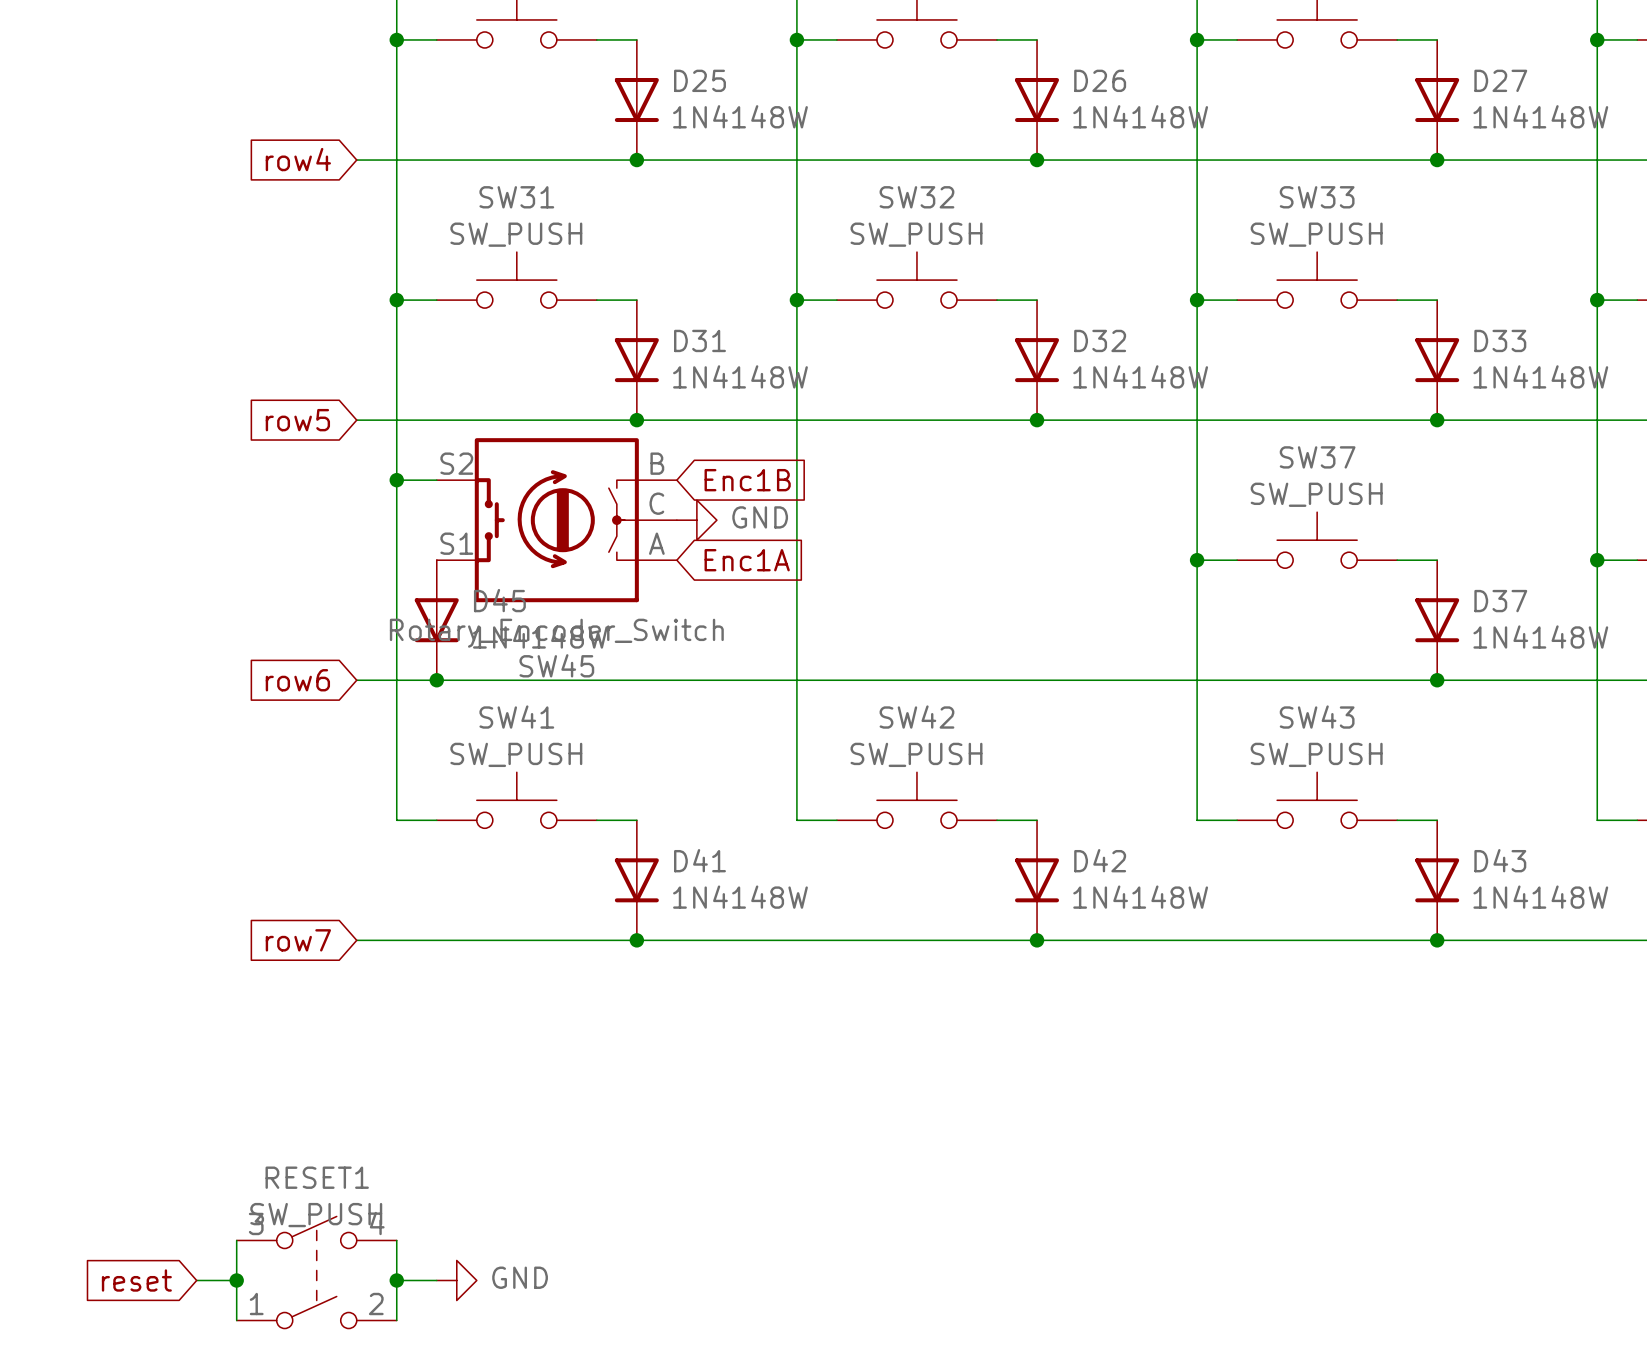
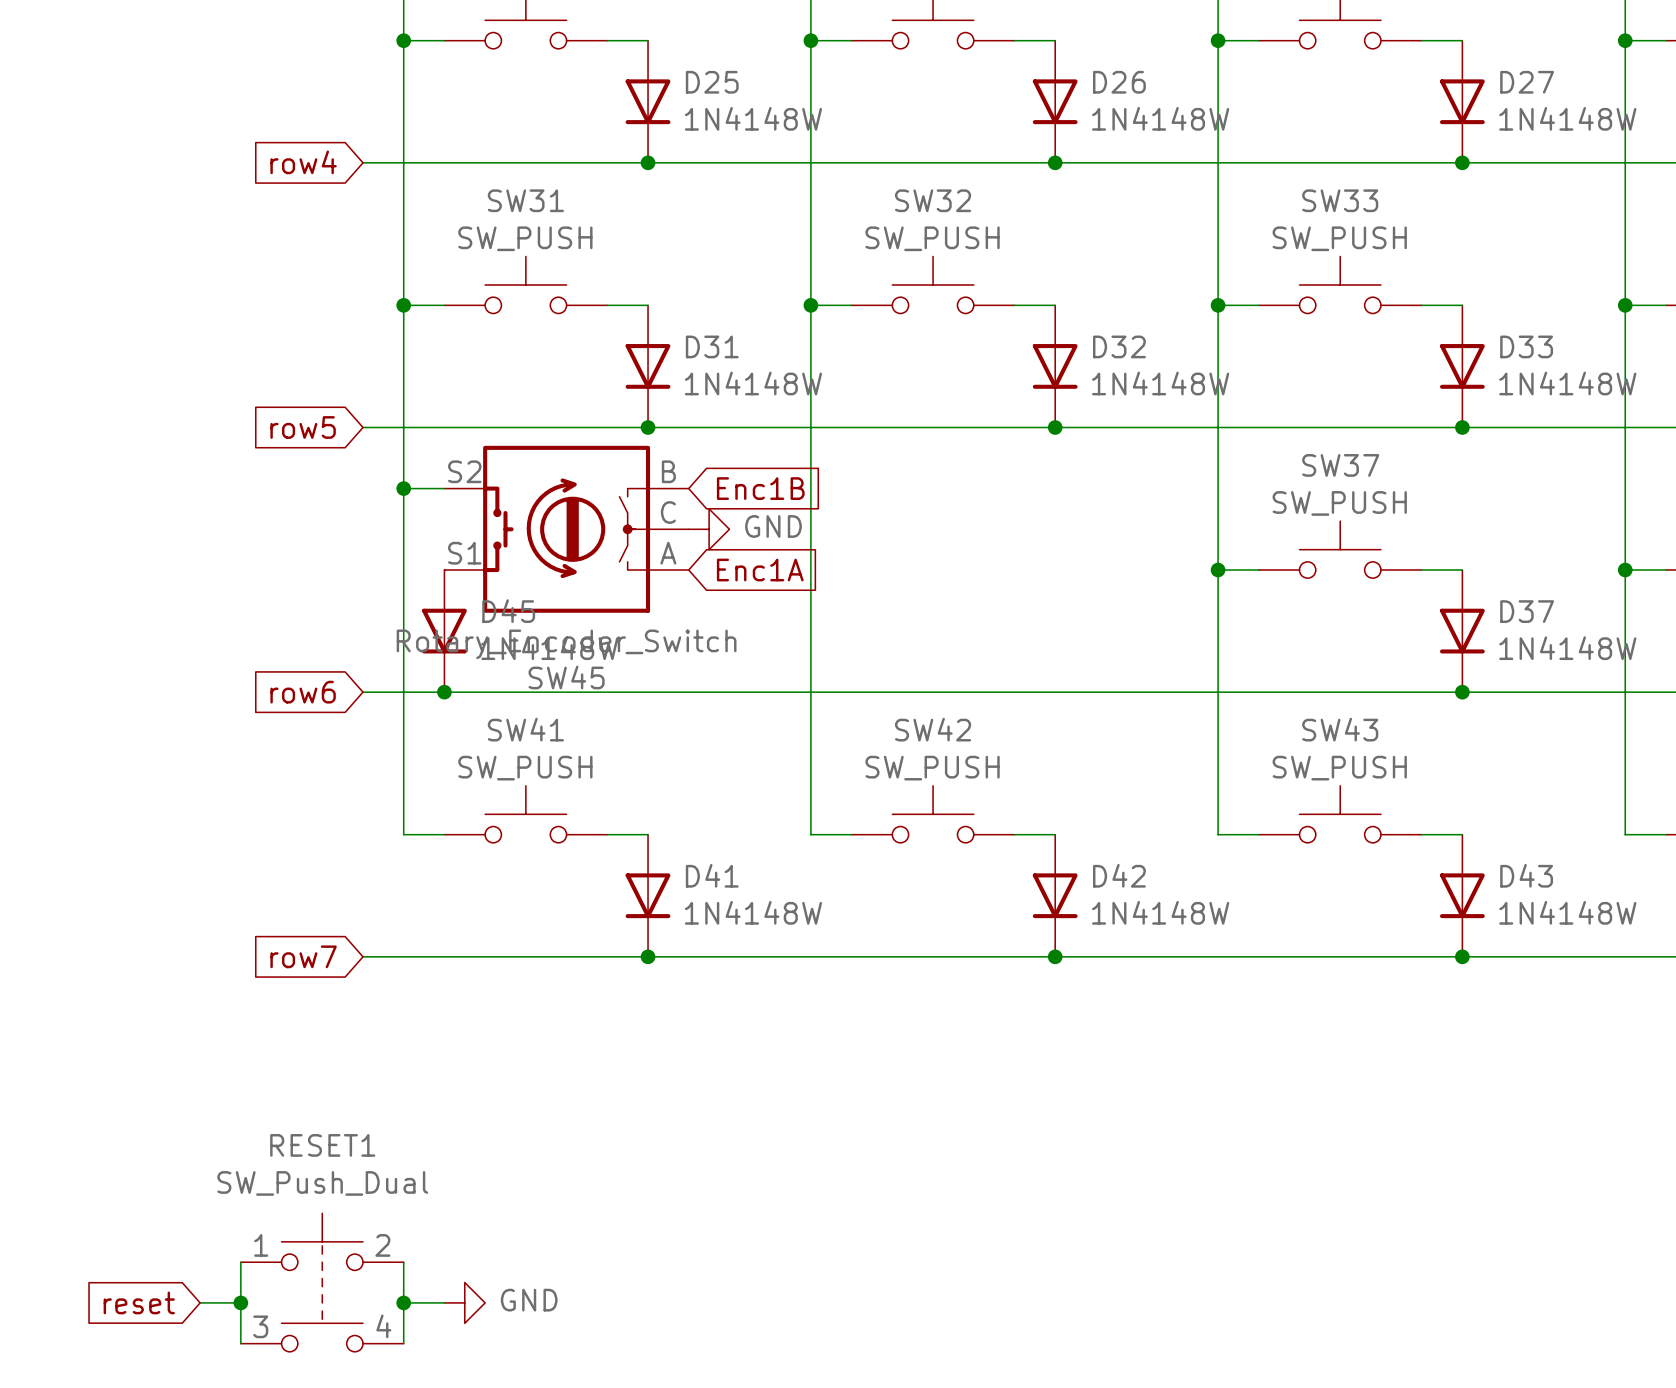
RESET1 name position: RESET1 (317, 1177) -> RESET1 (322, 1145)
RESET1 value: SW_PUSH (316, 1215) -> SW_Push_Dual (322, 1183)
RESET1 symbol: [236, 1216, 397, 1329] -> [240, 1213, 404, 1352]

